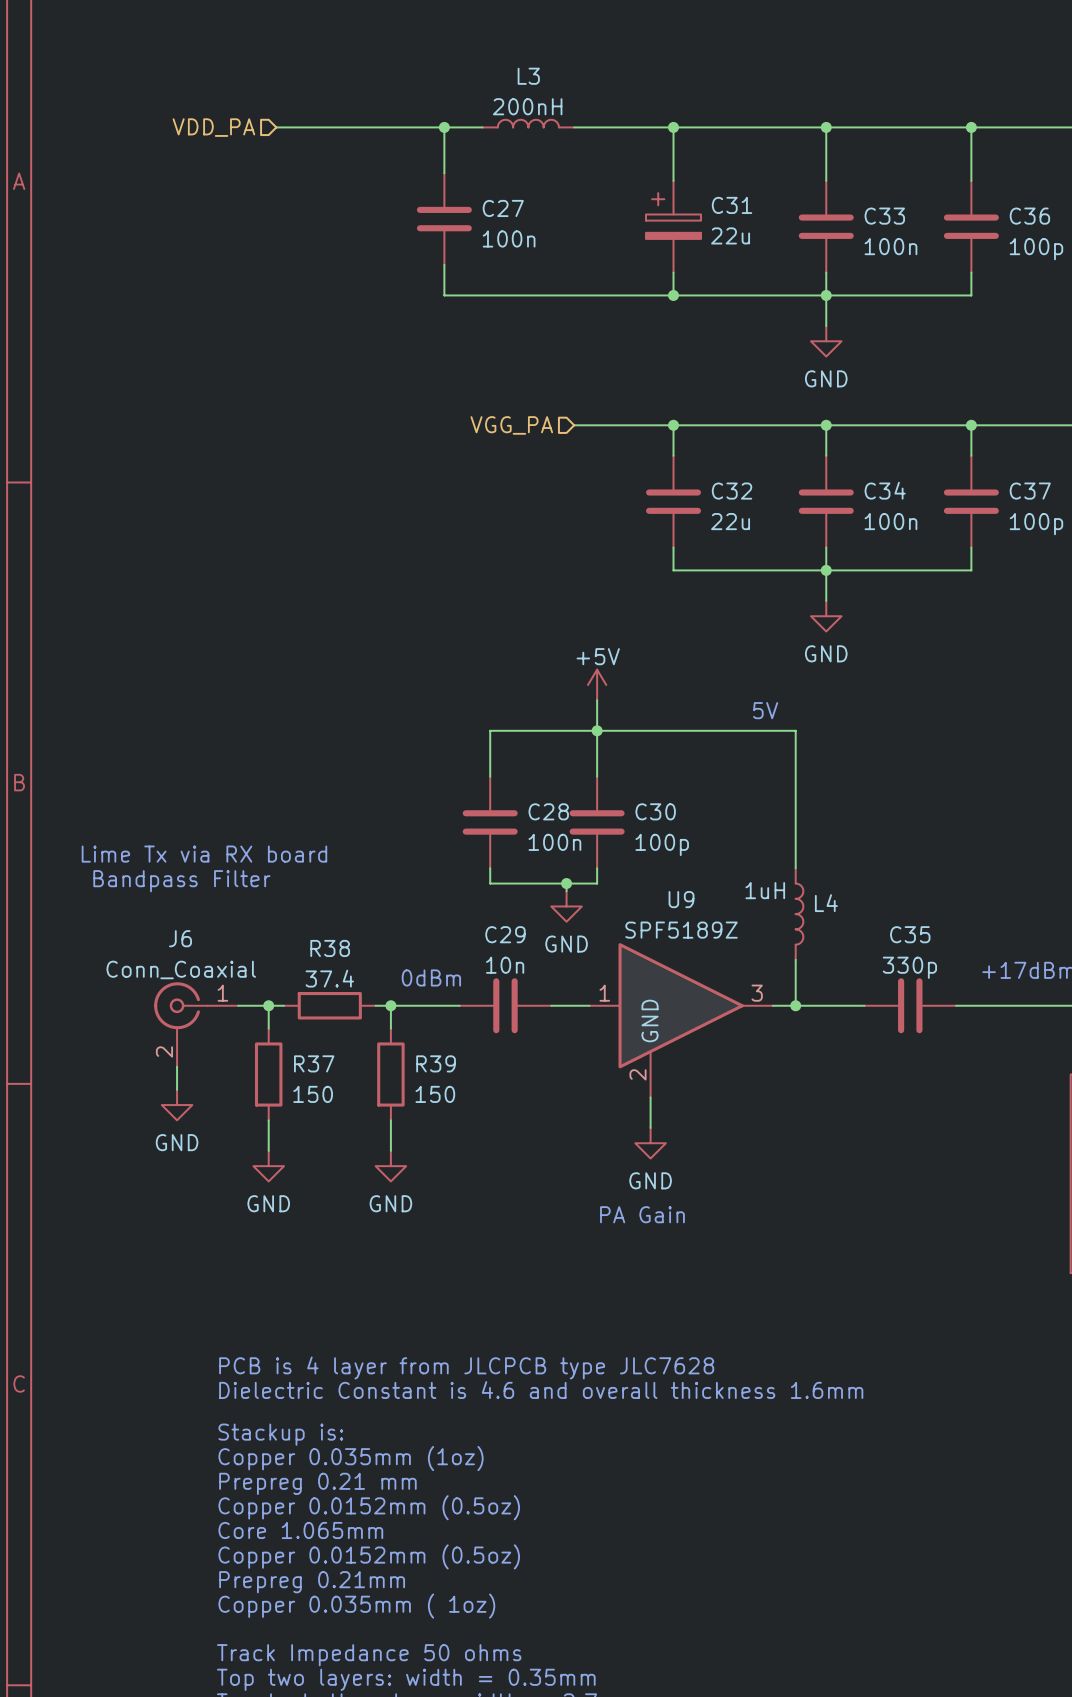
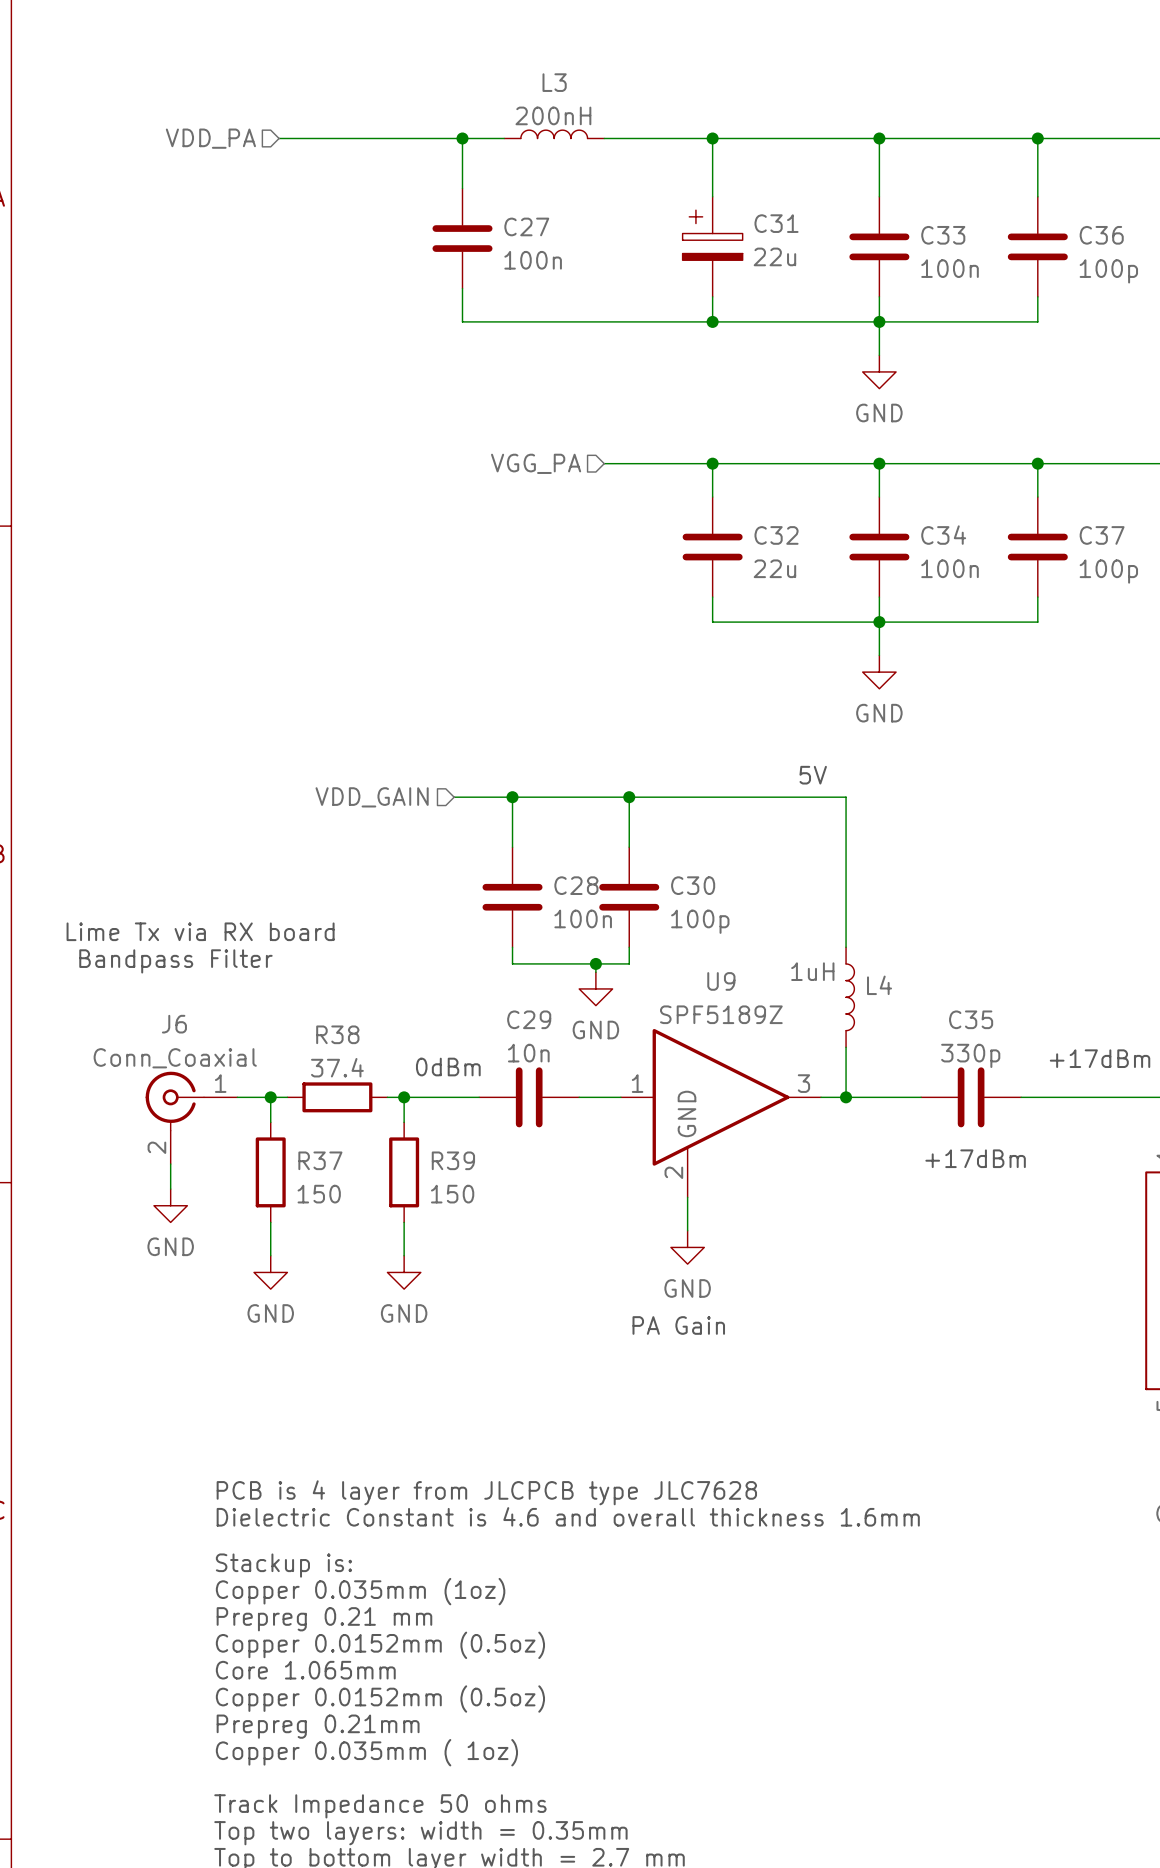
power symbol: +5V (597, 684) -> none
wire: (597, 700) (597, 730) -> none
hierarchical label: none -> VDD_GAIN (372, 797)
wire: none -> (454, 797) (512, 797)
junction: none -> (512, 797)
text: none -> +17dBm (975, 1158)

